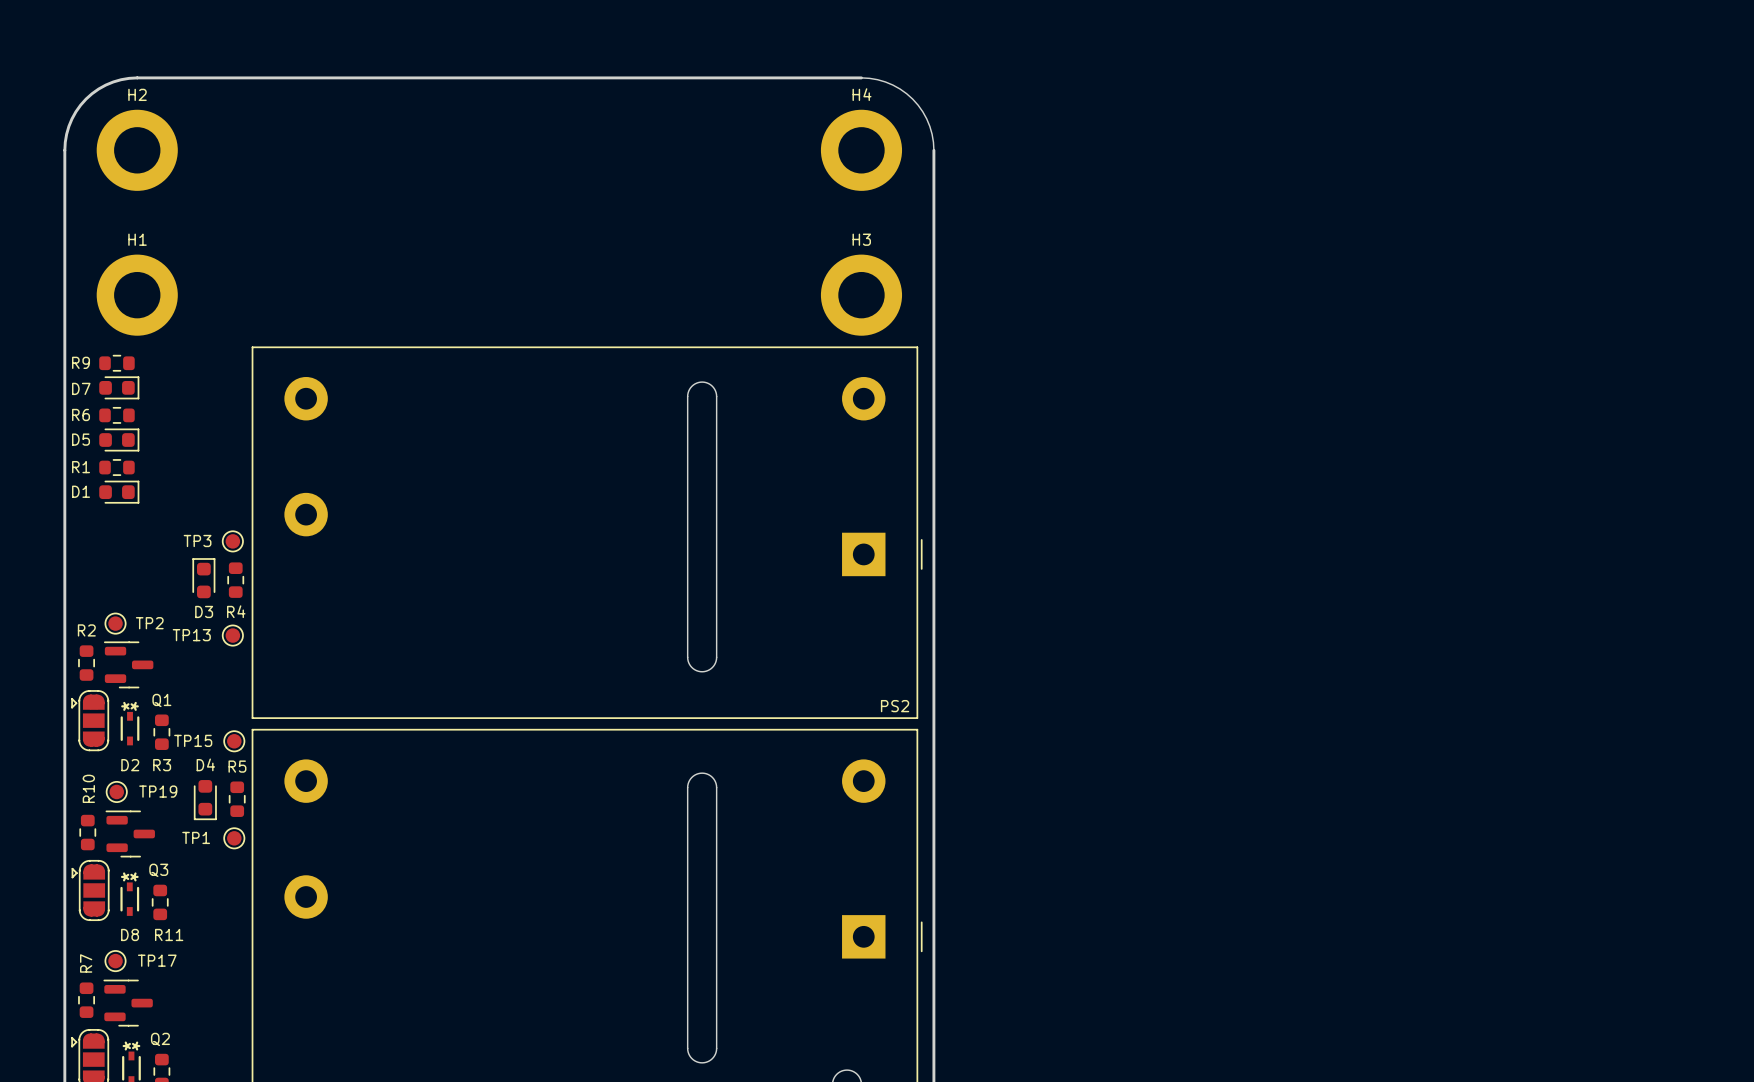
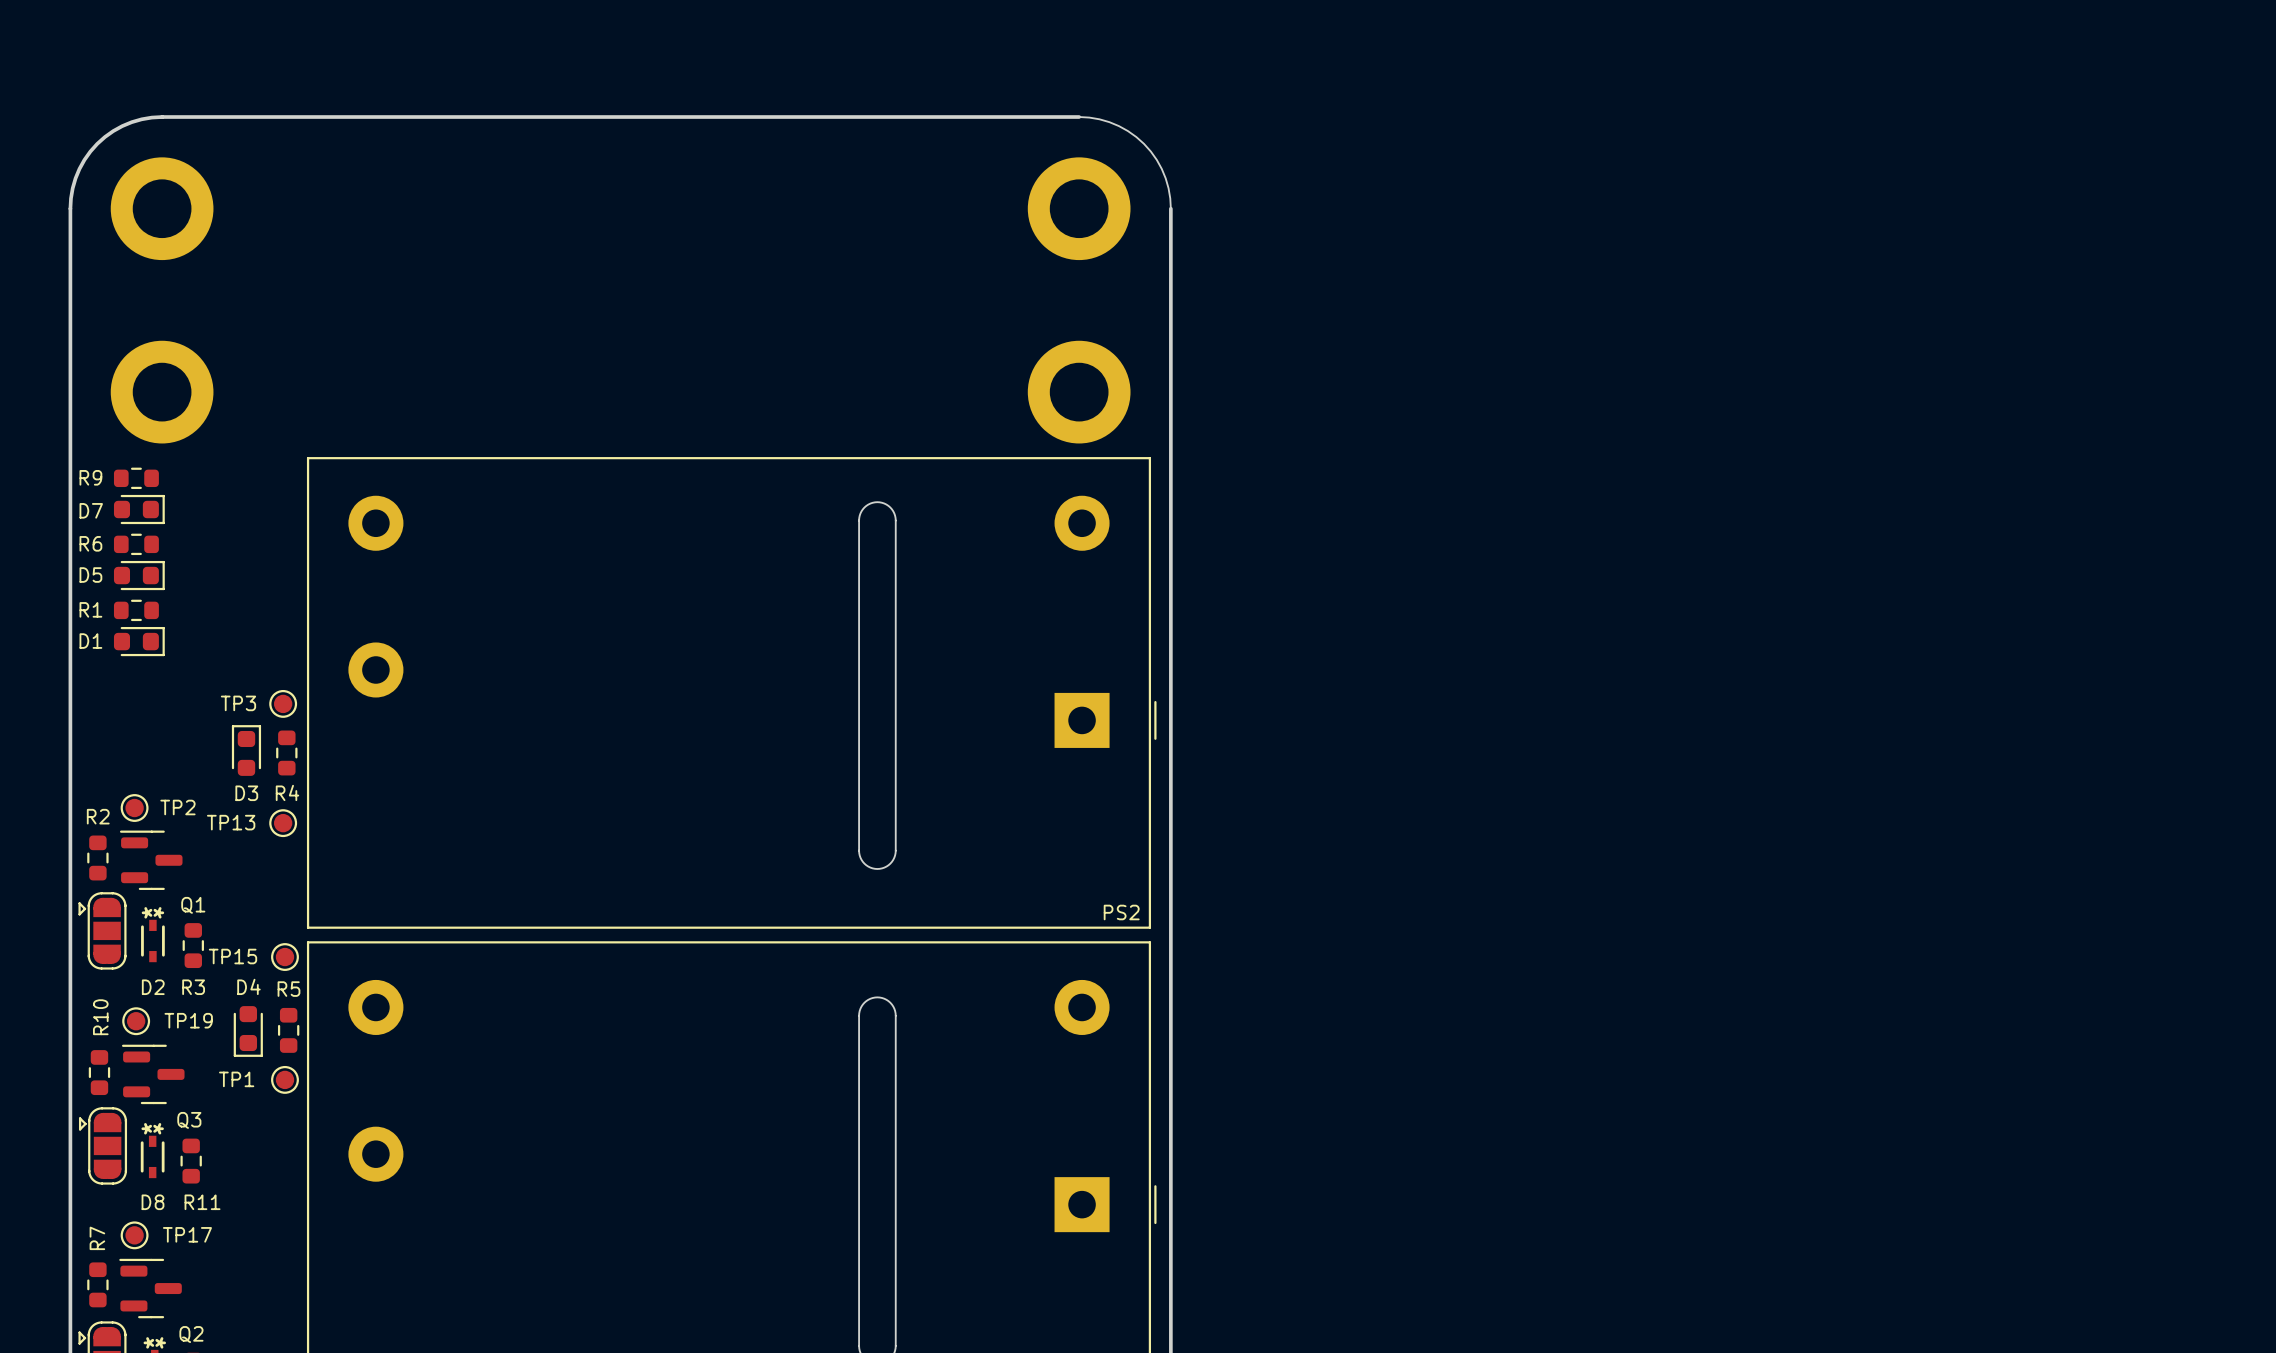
H2 name: H2 (137, 94) -> none
H4 name: H4 (862, 94) -> none
H1 name: H1 (137, 239) -> none
H3 name: H3 (861, 239) -> none

